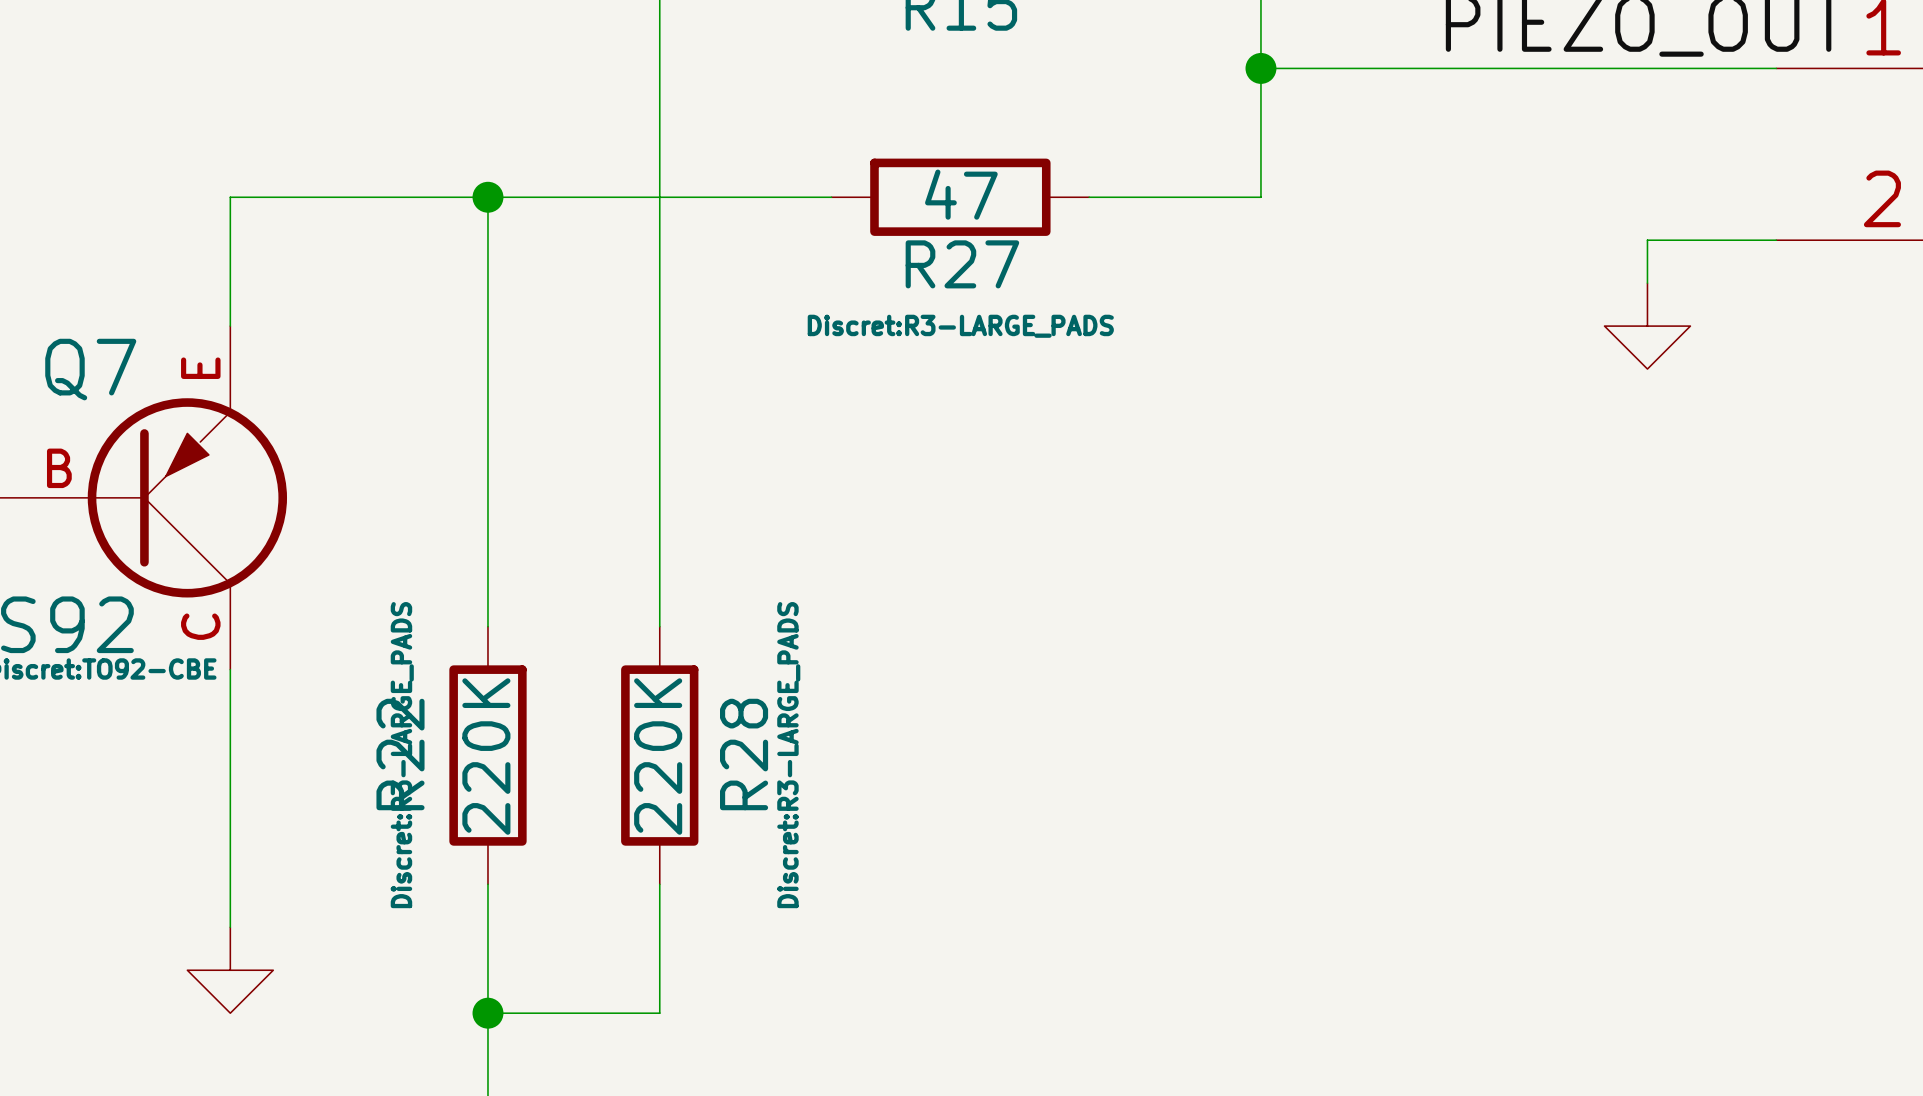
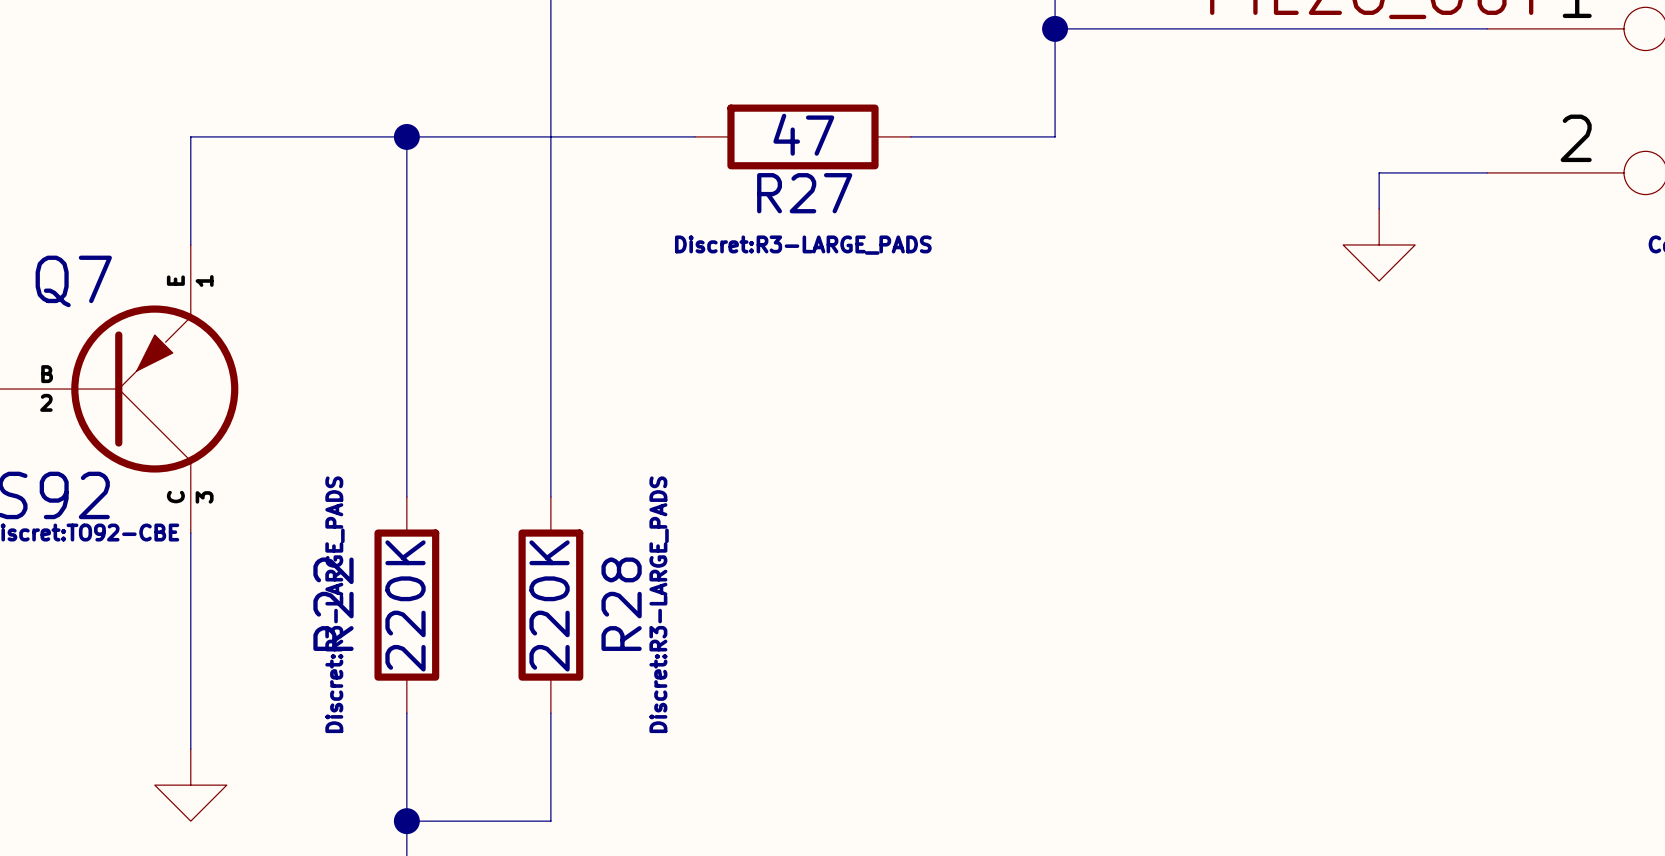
Q7 pin number: E (200, 368) -> 1 (204, 280)
Q7 pin name: none -> E (175, 280)
Q7 pin number: B (59, 468) -> 2 (46, 402)
Q7 pin name: none -> B (47, 374)
Q7 pin number: C (200, 626) -> 3 (204, 497)
Q7 pin name: none -> C (175, 497)

